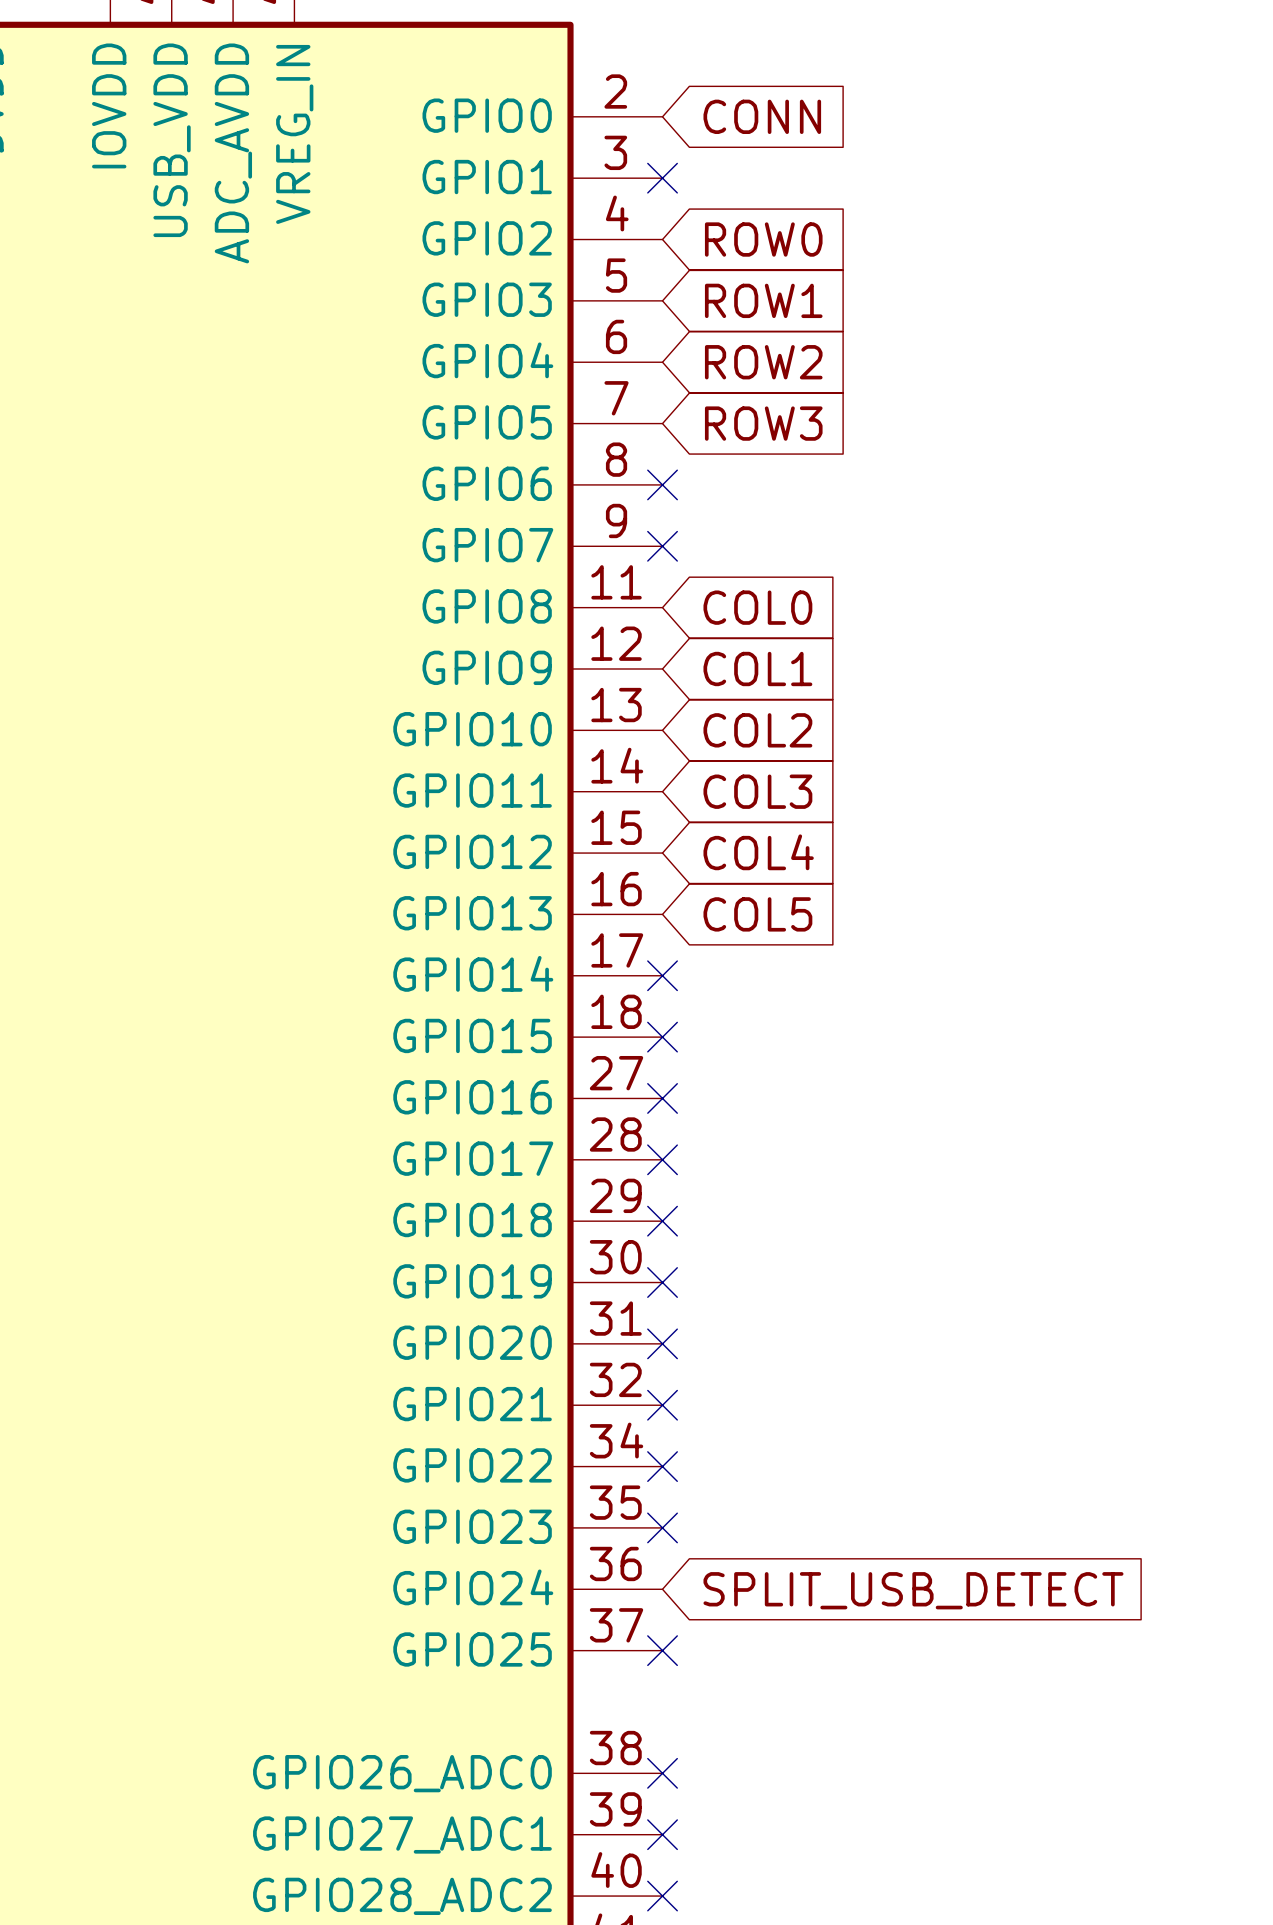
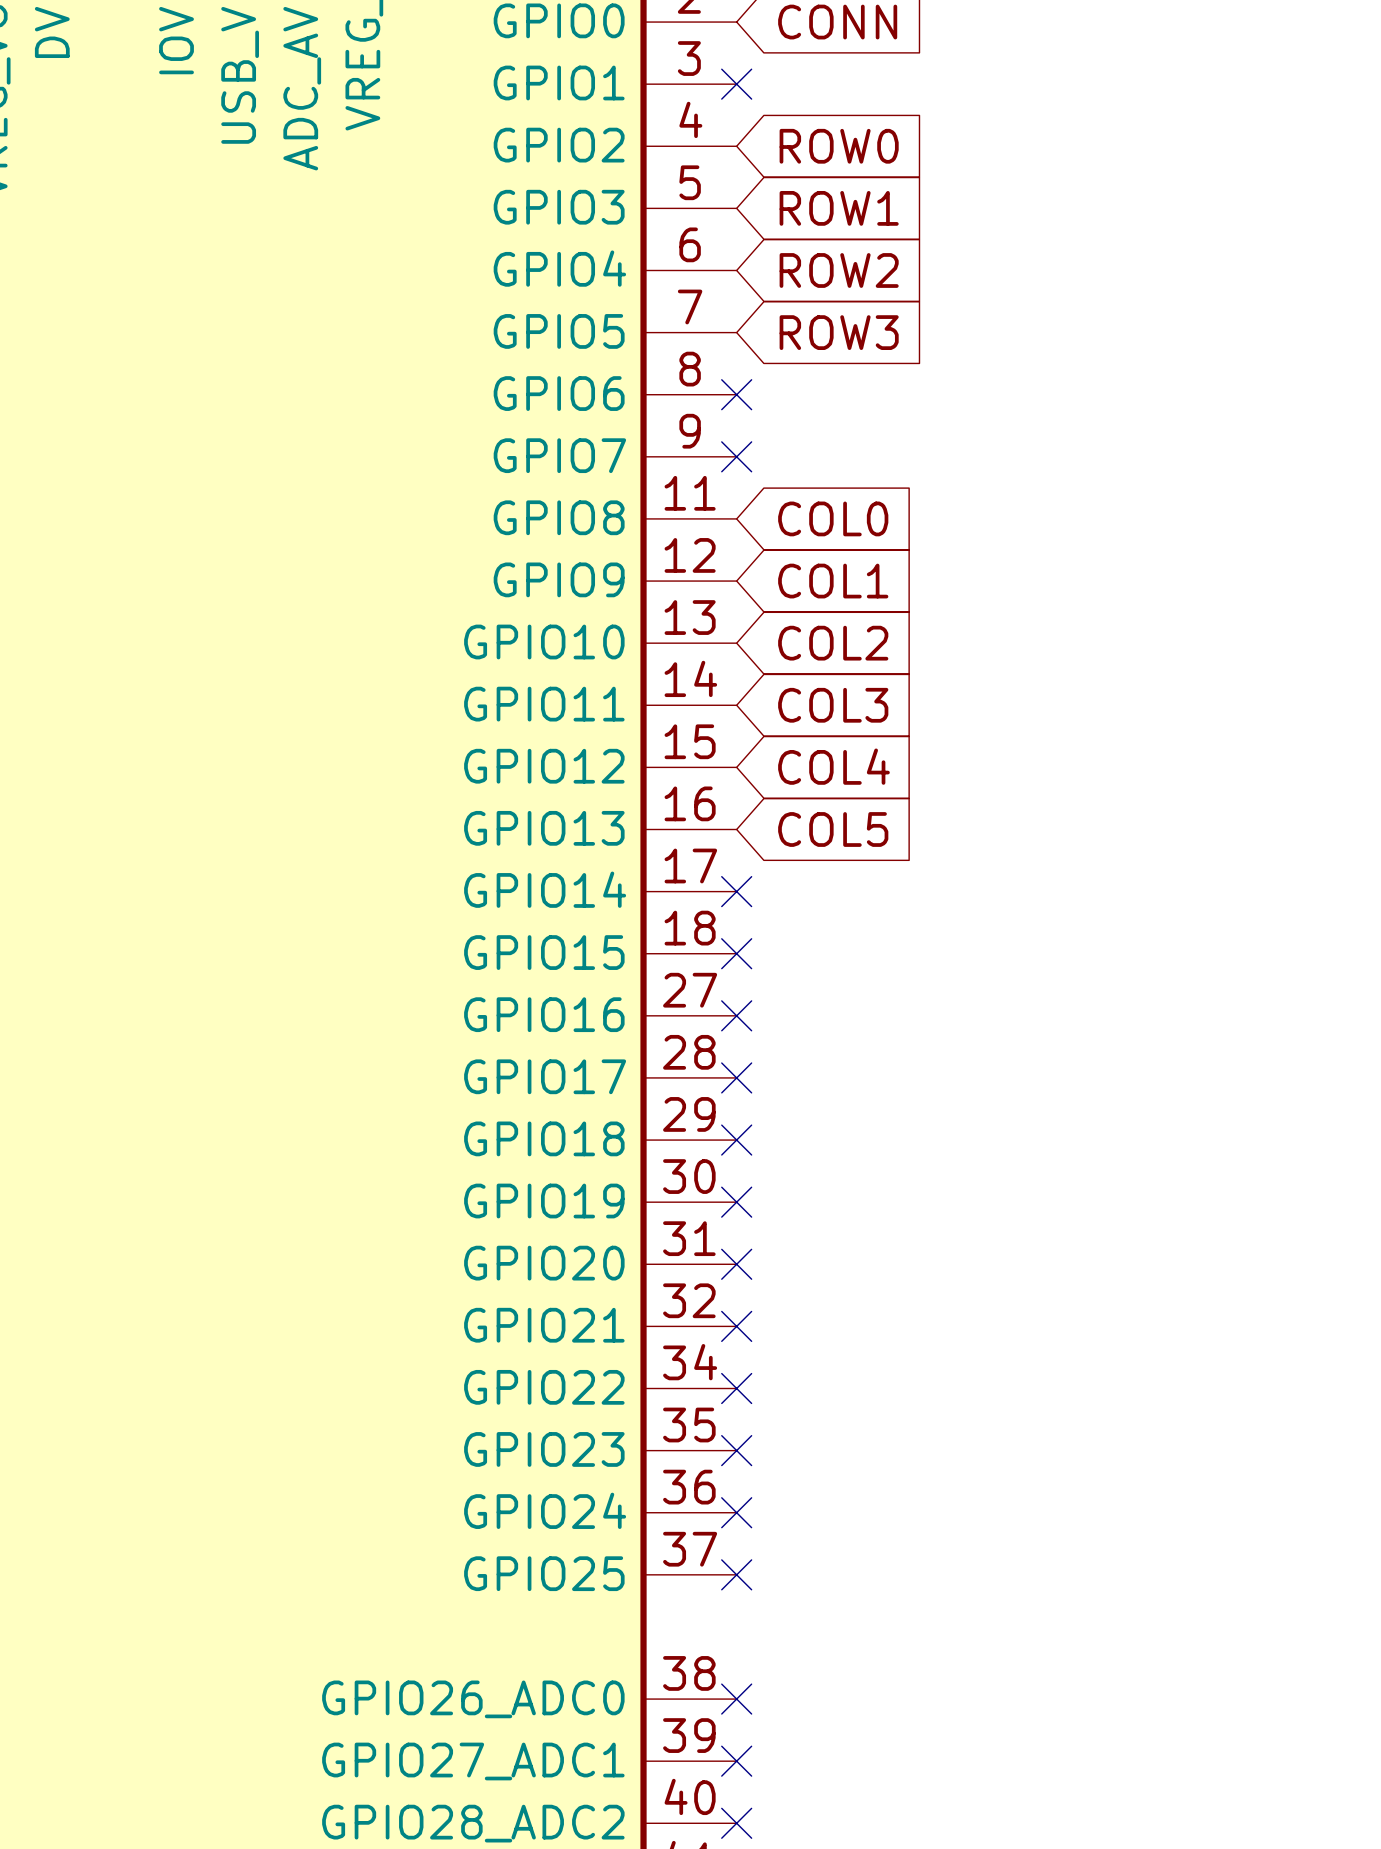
no-connect mark: none -> (736, 1512)
global label: SPLIT_USB_DETECT (913, 1590) -> none

